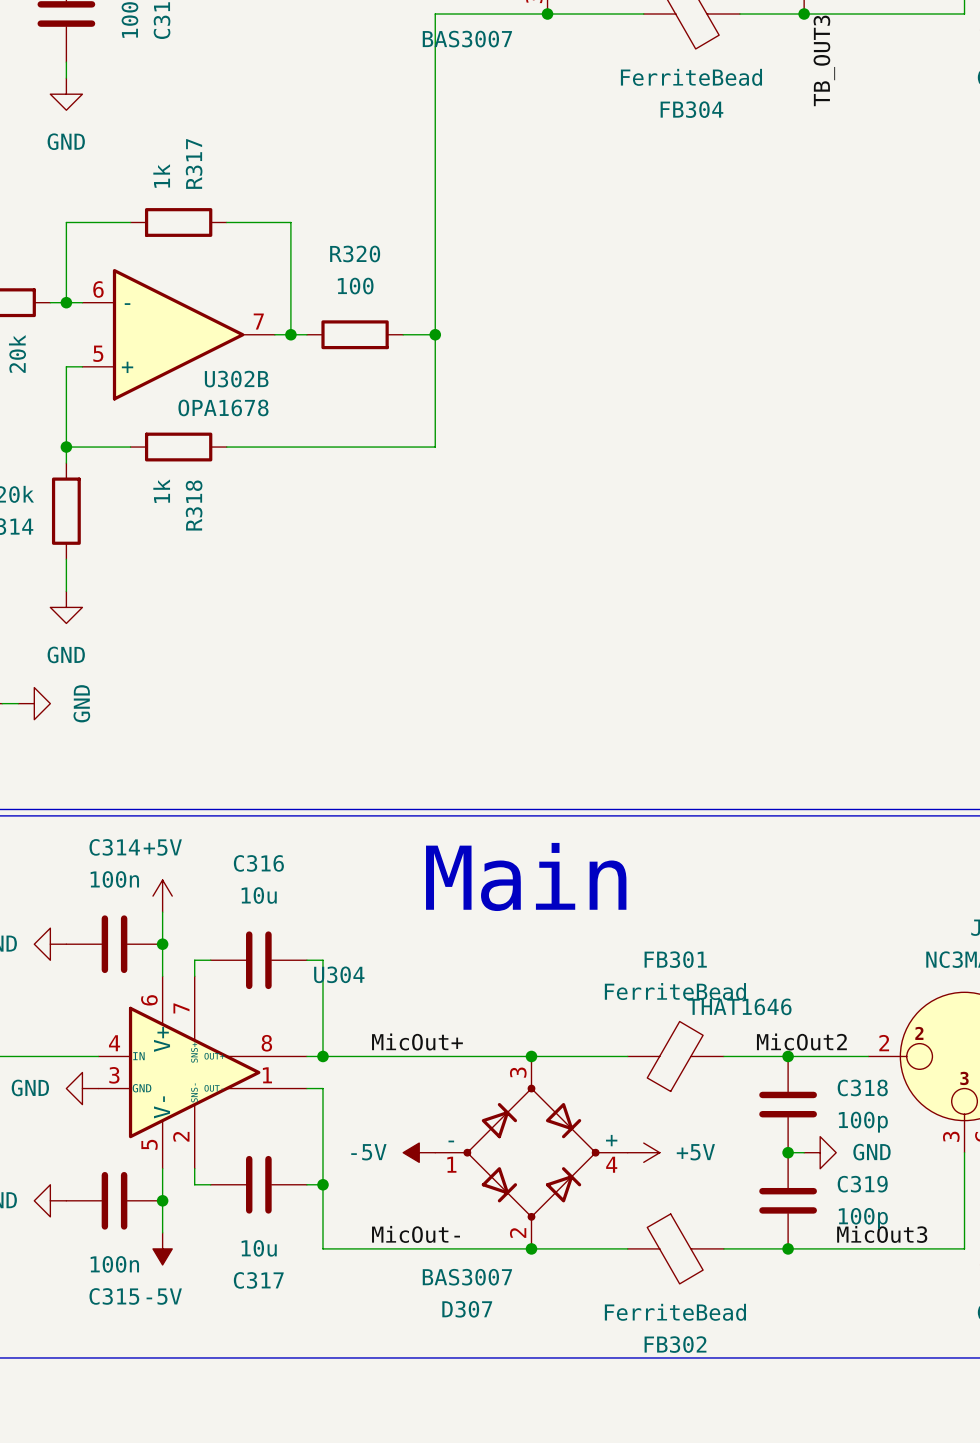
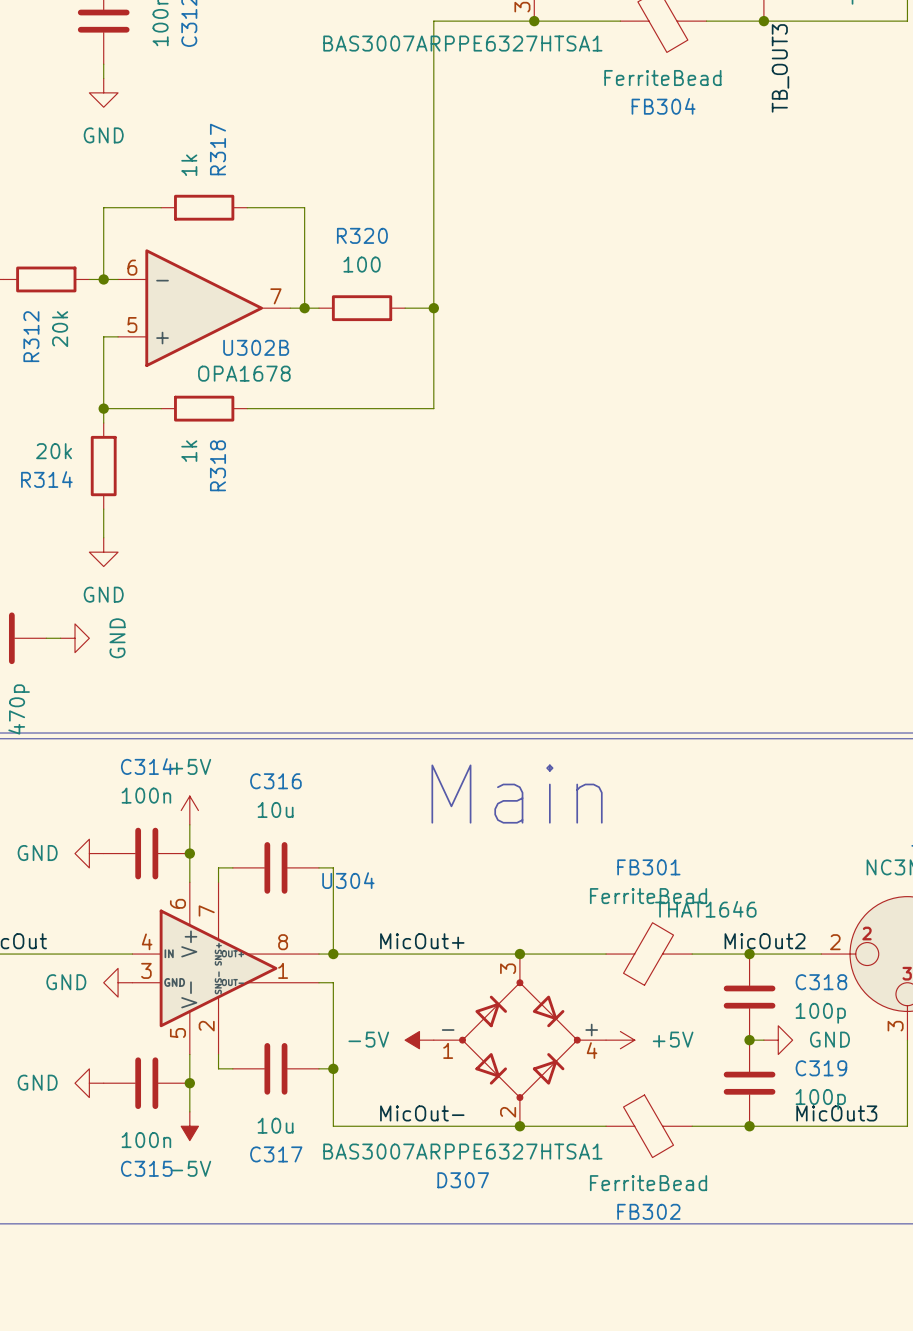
part value: BAS3007 (467, 39) -> BAS3007ARPPE6327HTSA1 (462, 43)
D307 value: BAS3007 (467, 1277) -> BAS3007ARPPE6327HTSA1 (462, 1151)

